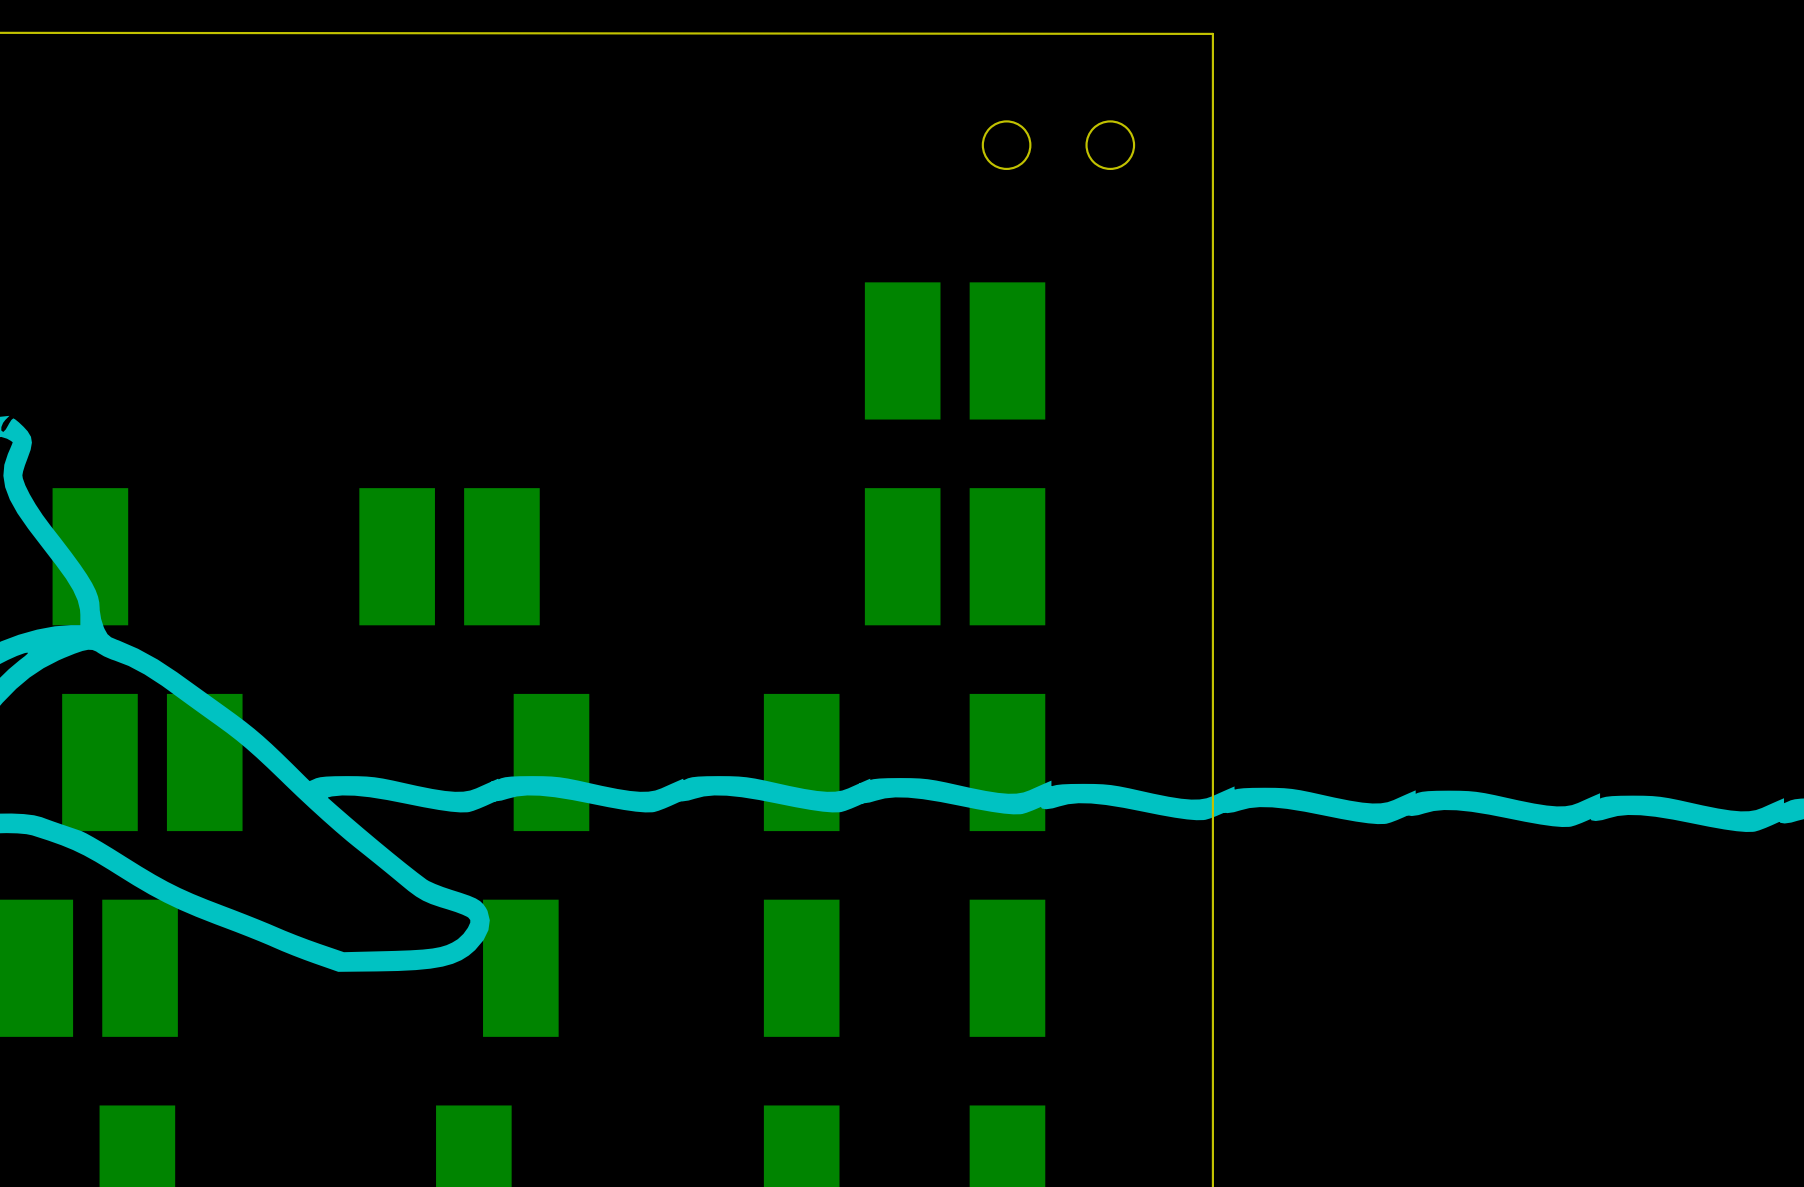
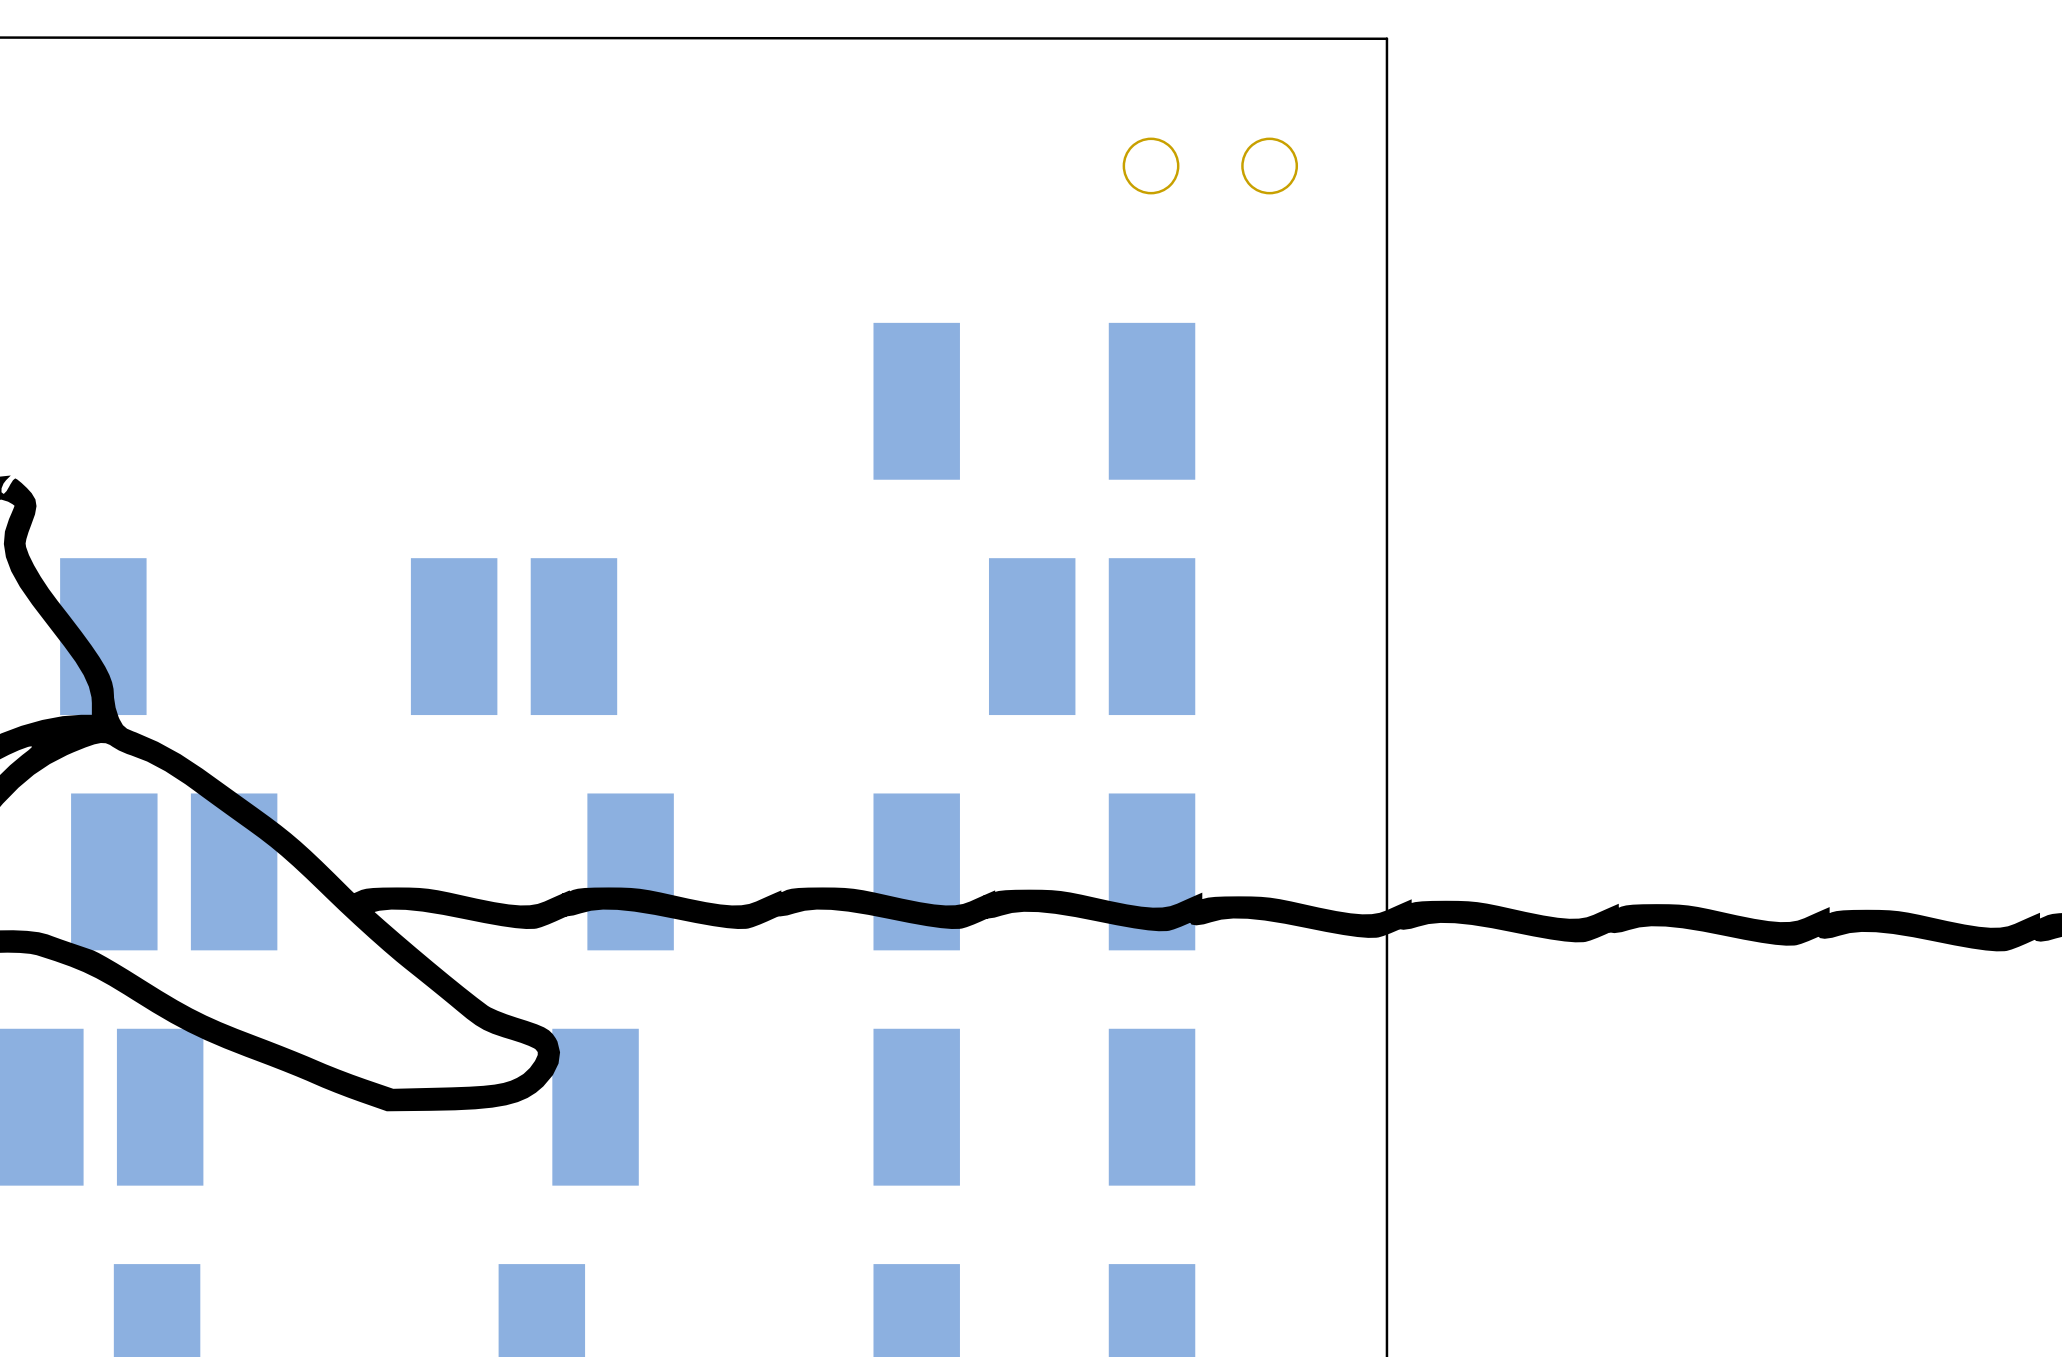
part position: (902, 350) -> (916, 401)

